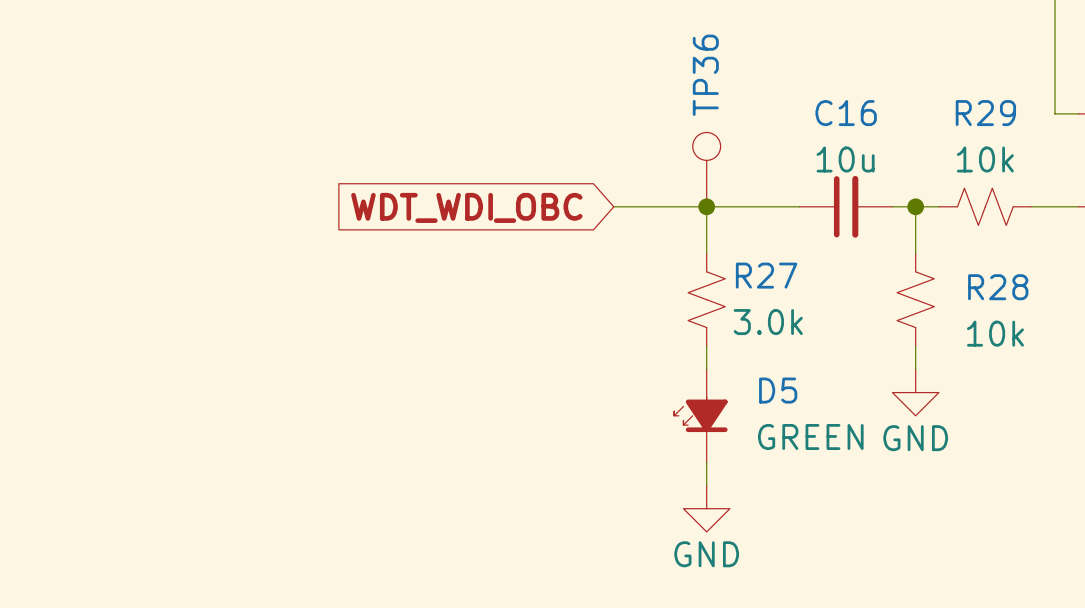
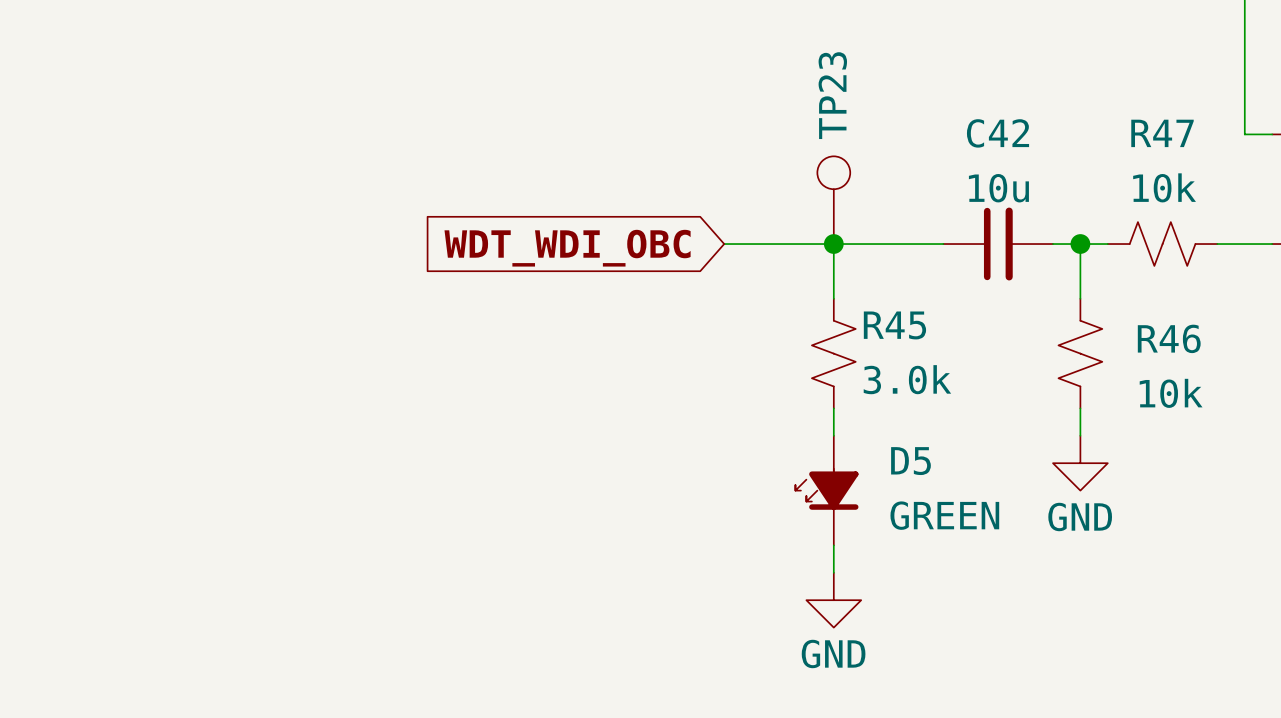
TP36 name: TP36 (705, 75) -> TP23 (832, 95)
C16 name: C16 (846, 113) -> C42 (998, 133)
R29 name: R29 (985, 113) -> R47 (1162, 133)
R27 name: R27 (766, 275) -> R45 (894, 325)
R28 name: R28 (998, 287) -> R46 (1169, 338)

